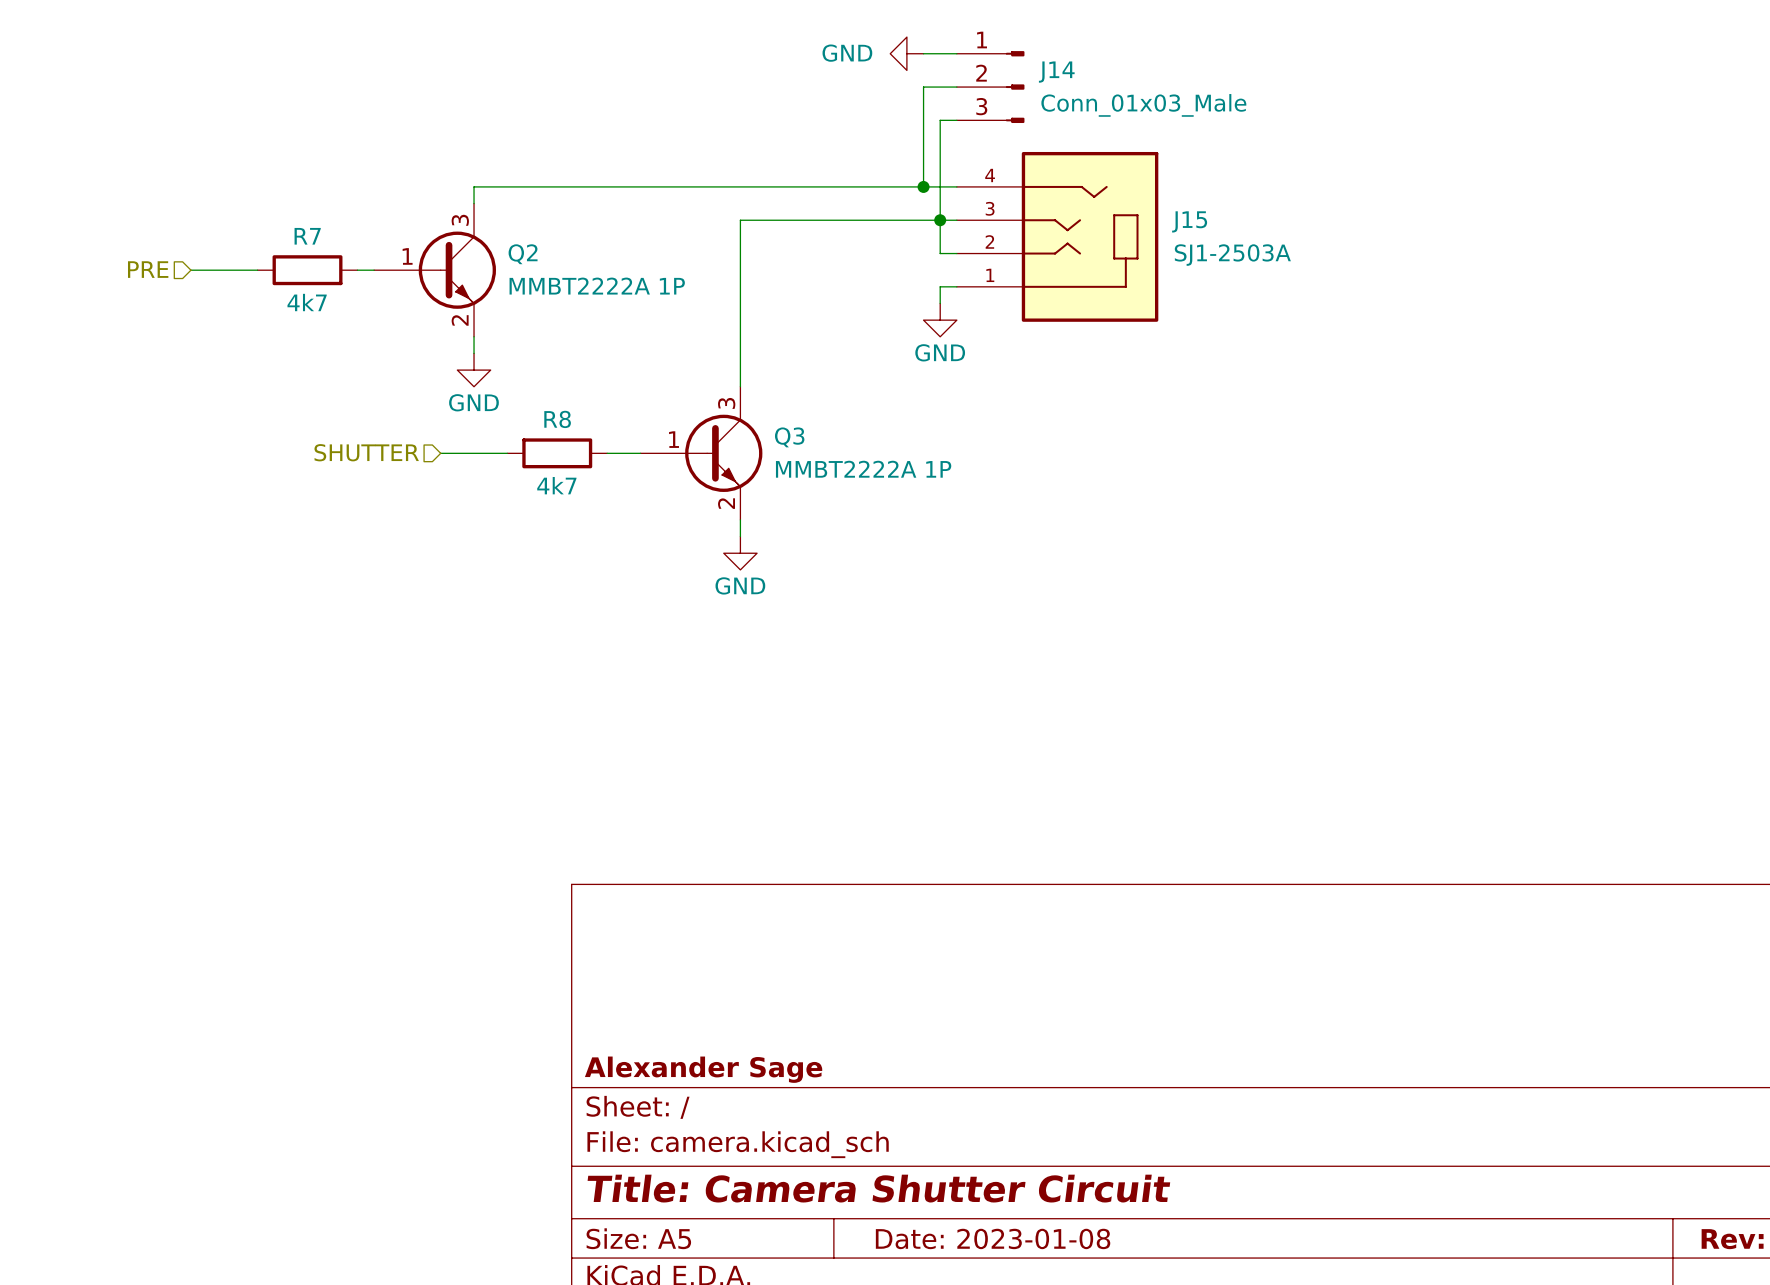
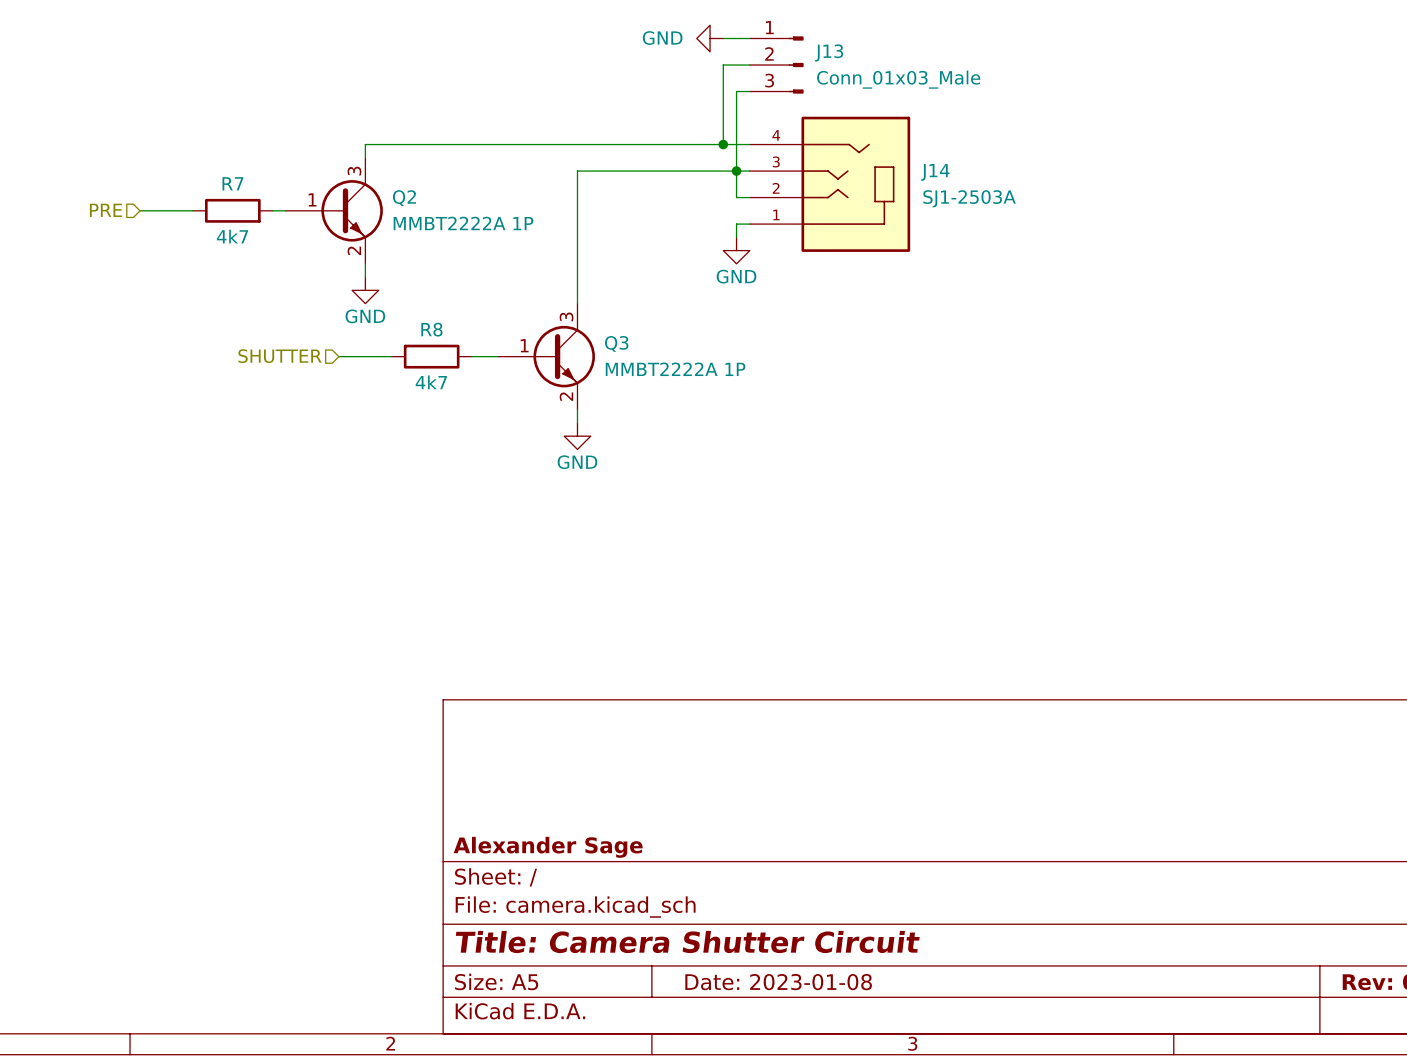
J14 name: J14 (1056, 72) -> J13 (829, 52)
J15 name: J15 (1189, 221) -> J14 (935, 172)

